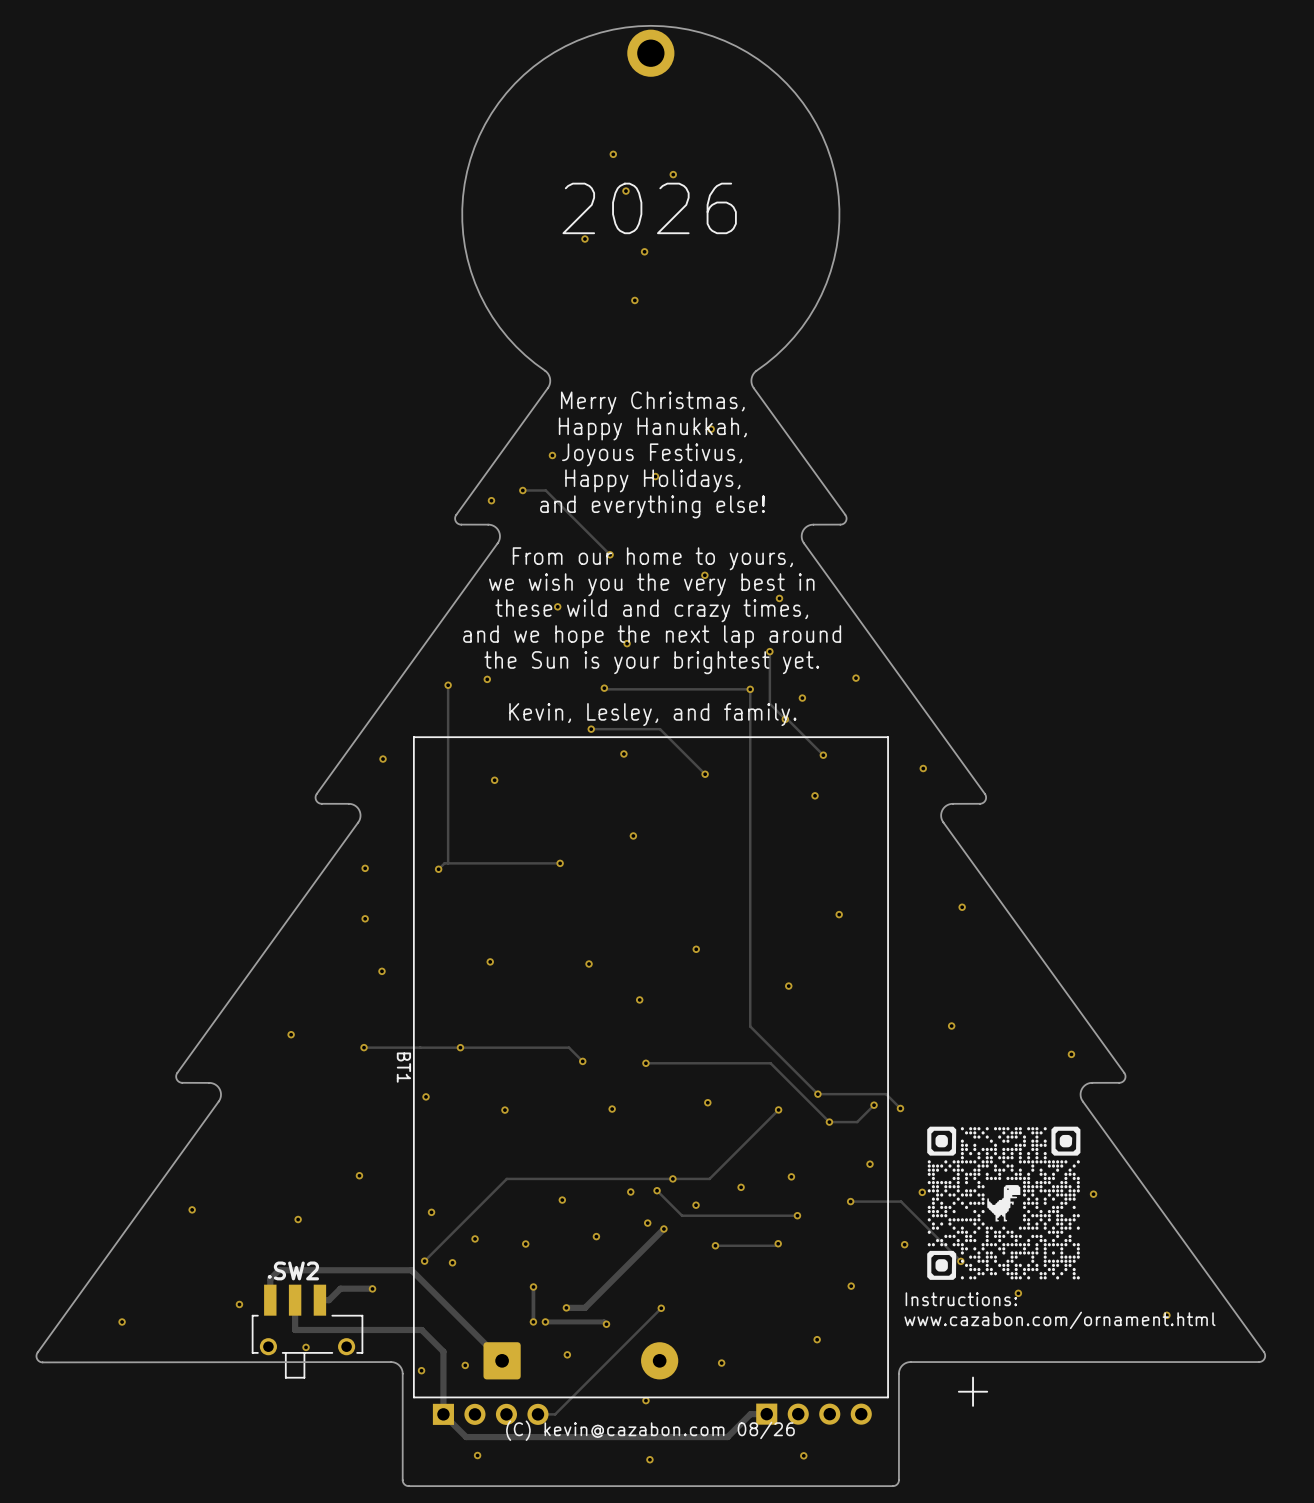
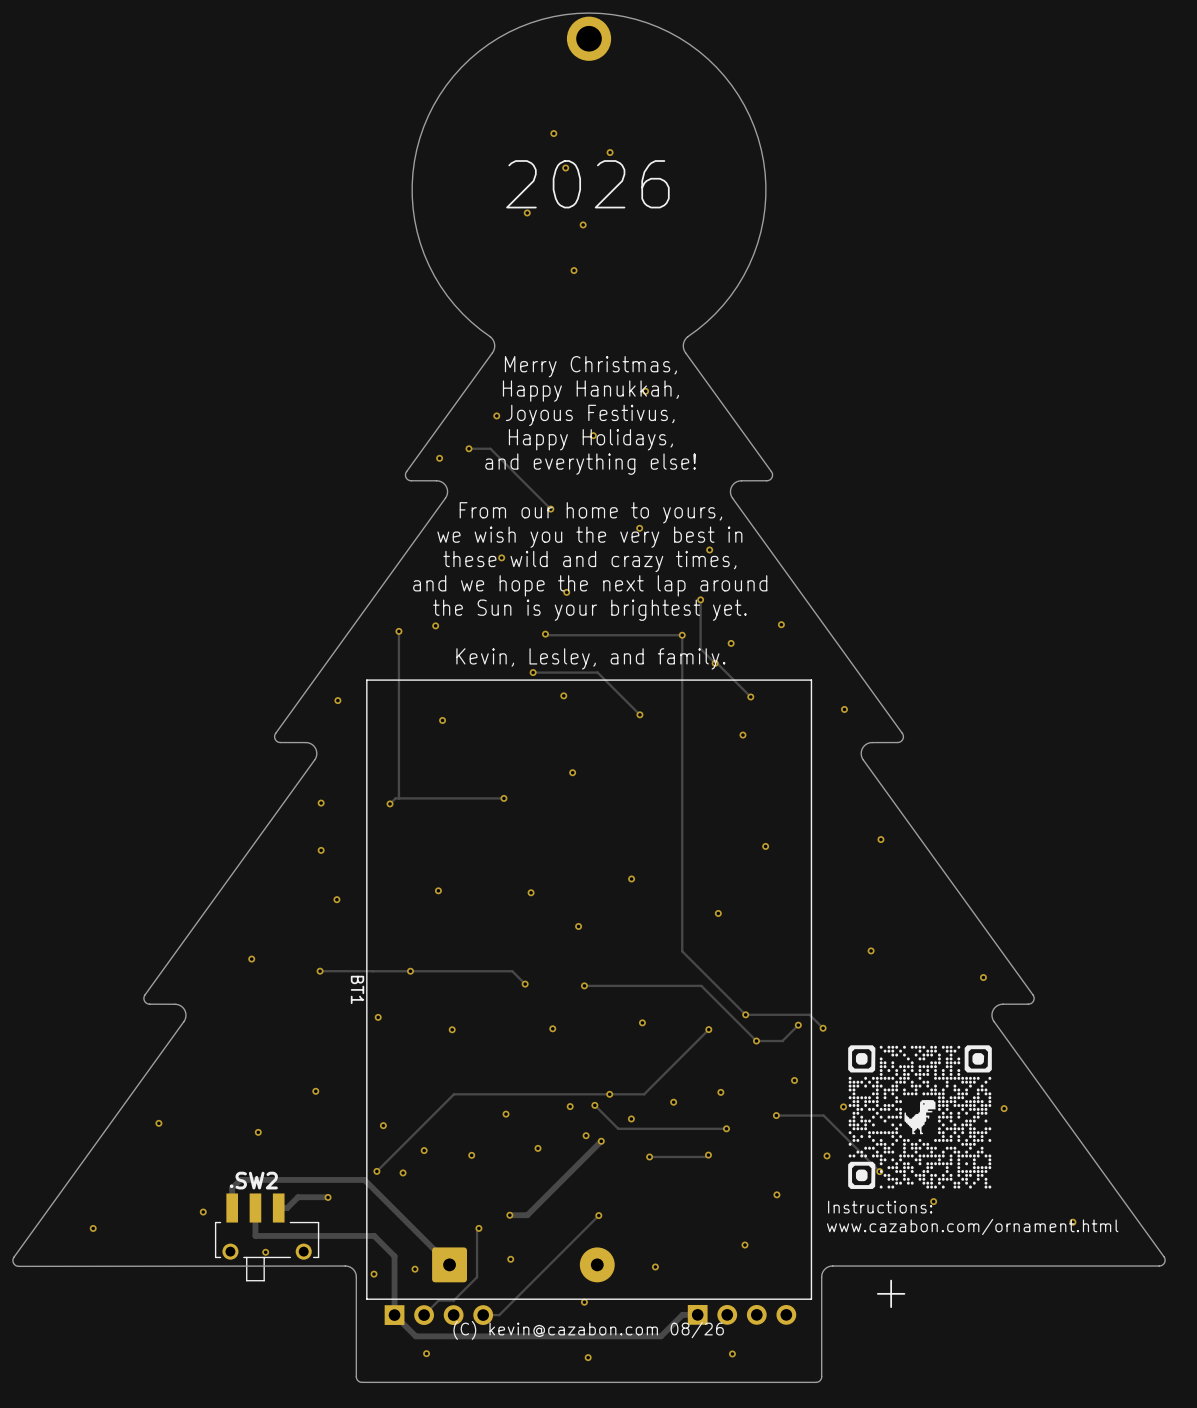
via: (533, 1286) -> none
track: (533, 1287) (533, 1321) -> none
track: none -> (477, 1228) (477, 1277) (453, 1300) (438, 1300) (424, 1315)
track: (545, 1321) (604, 1321) (606, 1324) -> none
via: (545, 1321) -> none
via: (606, 1324) -> none

